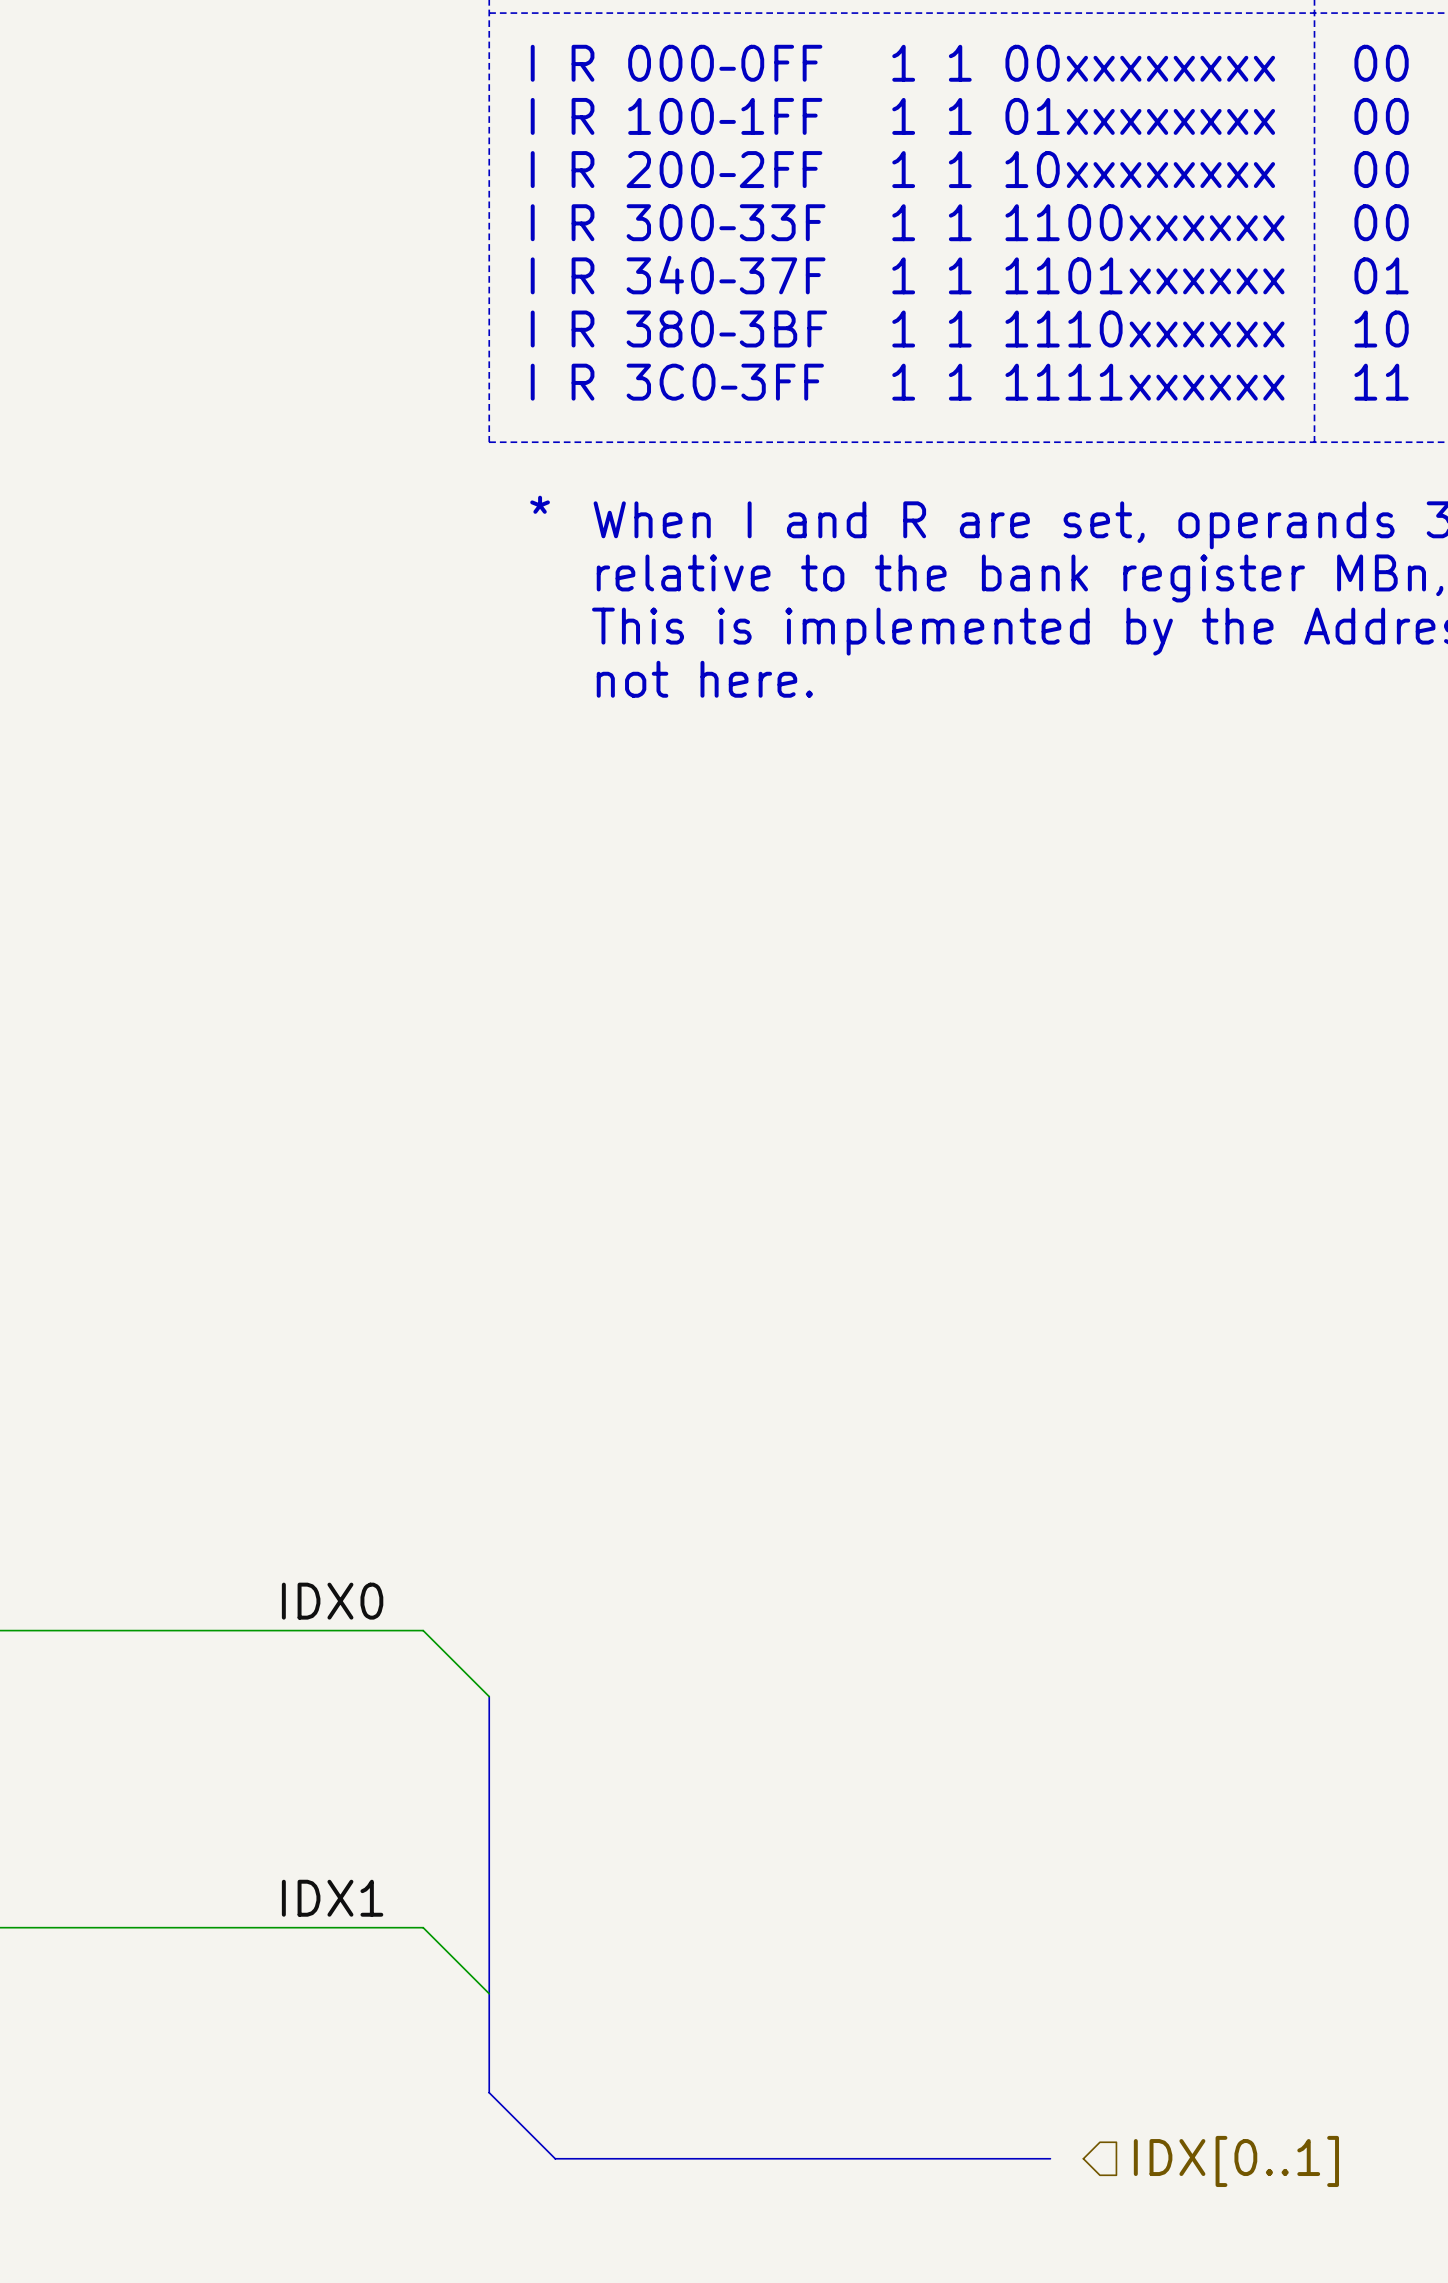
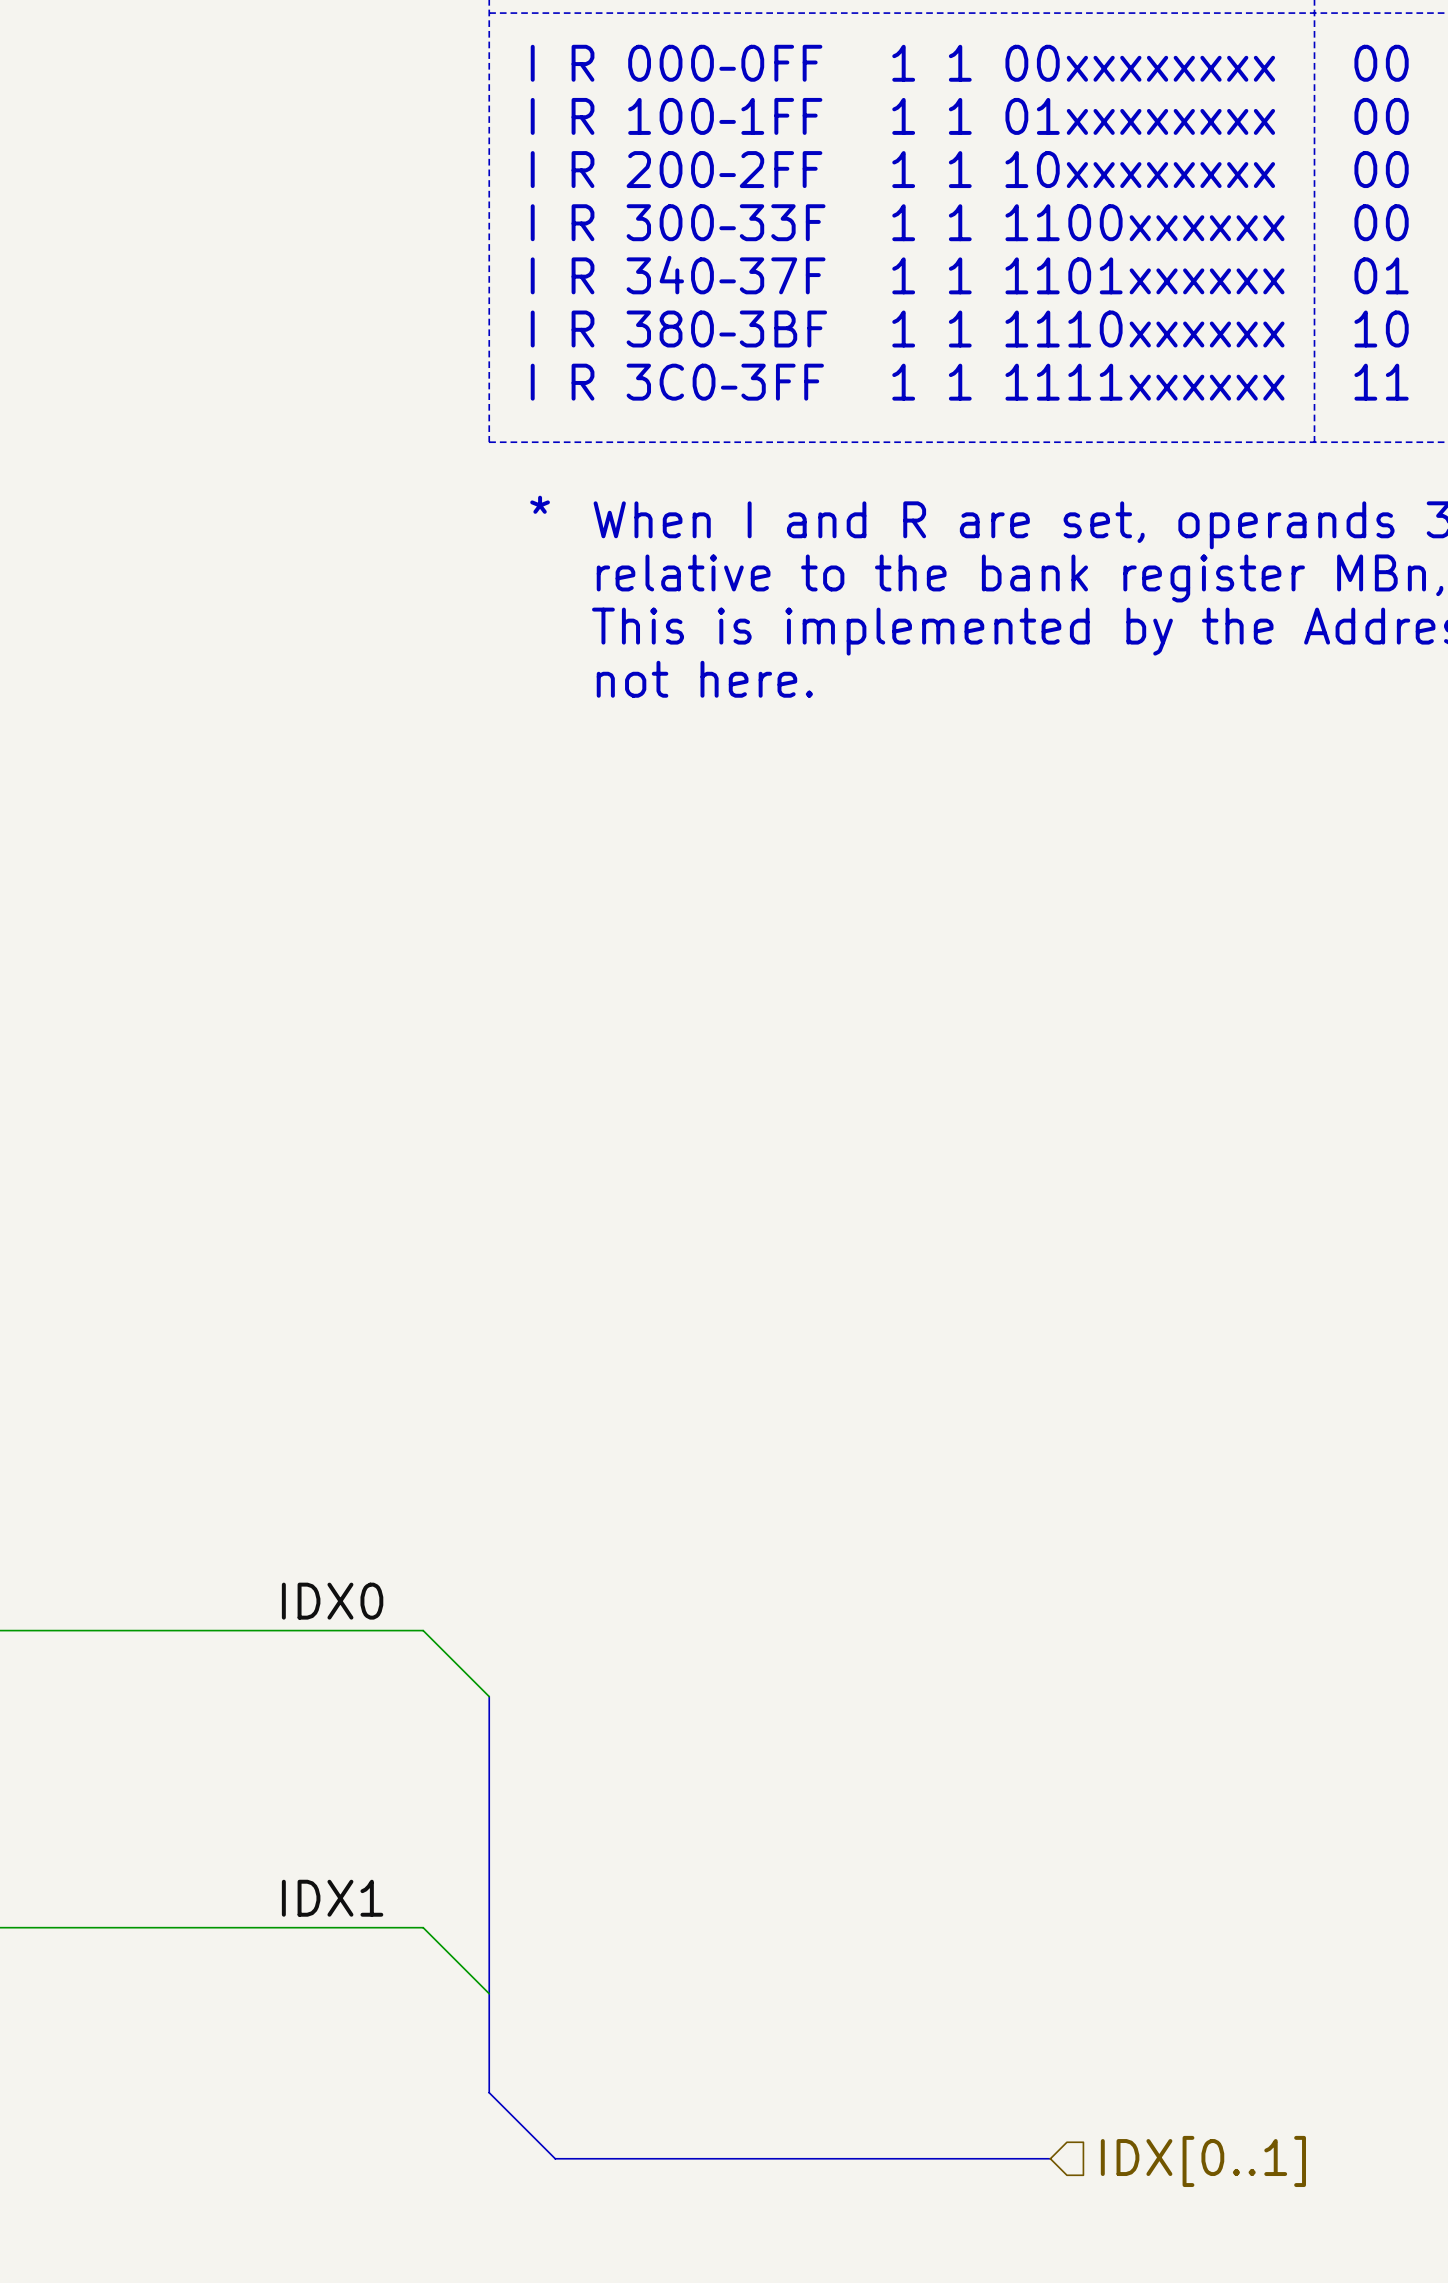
hierarchical label position: IDX[0..1] (1236, 2161) -> IDX[0..1] (1203, 2161)

